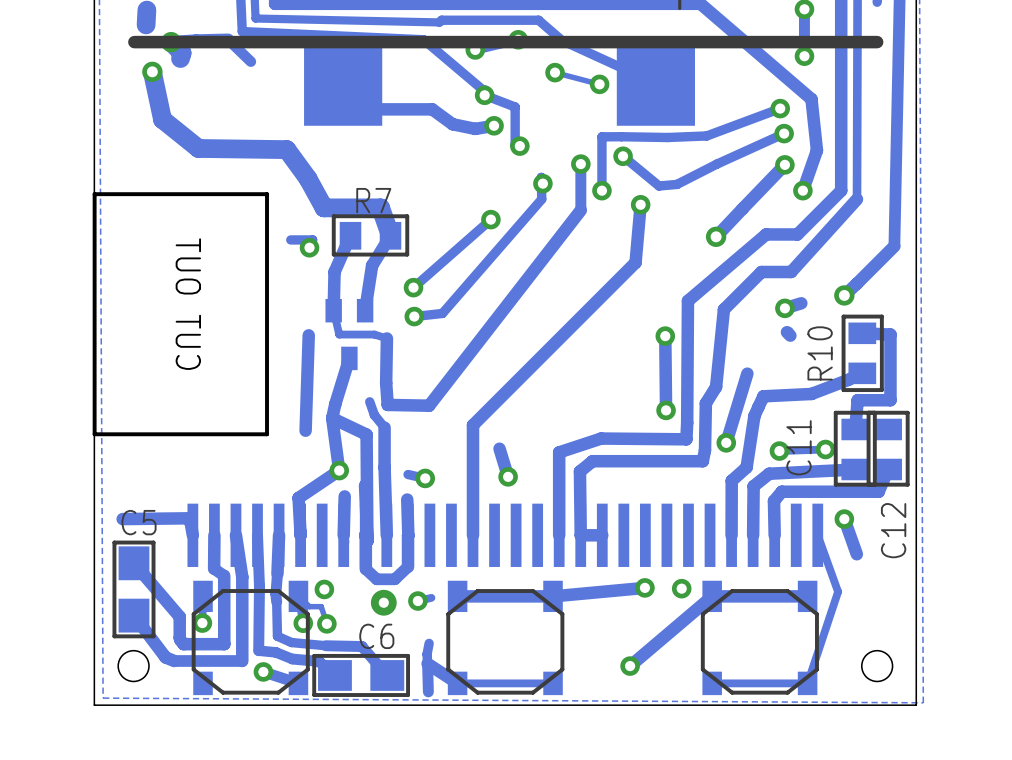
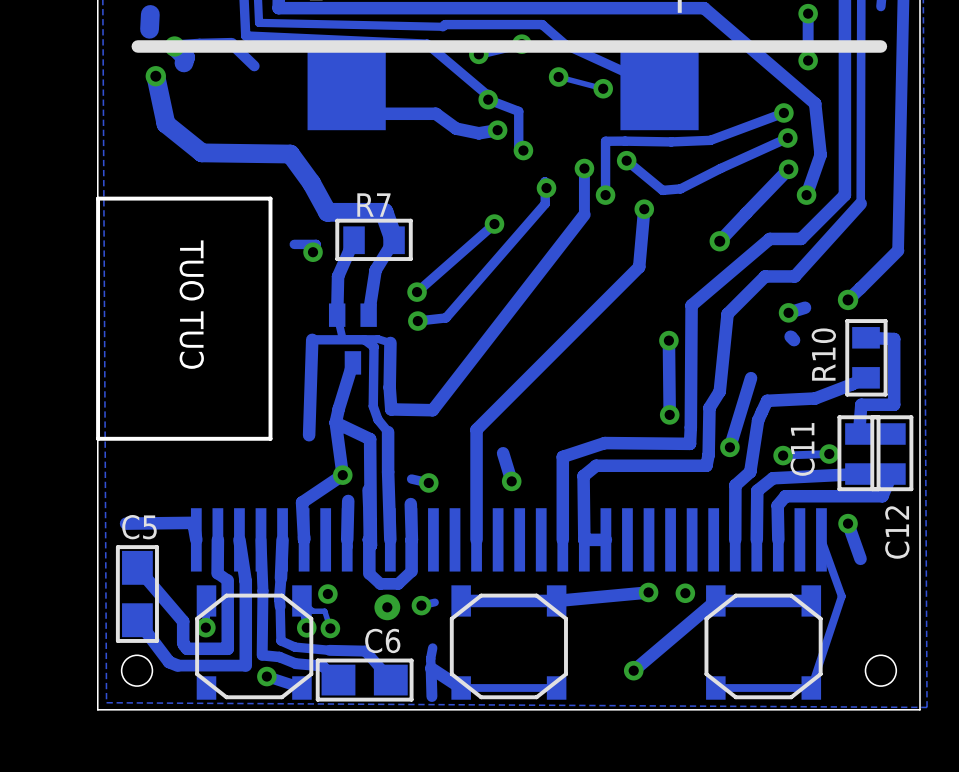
track: none -> (312, 339) (364, 339) (374, 346) (373, 406)

